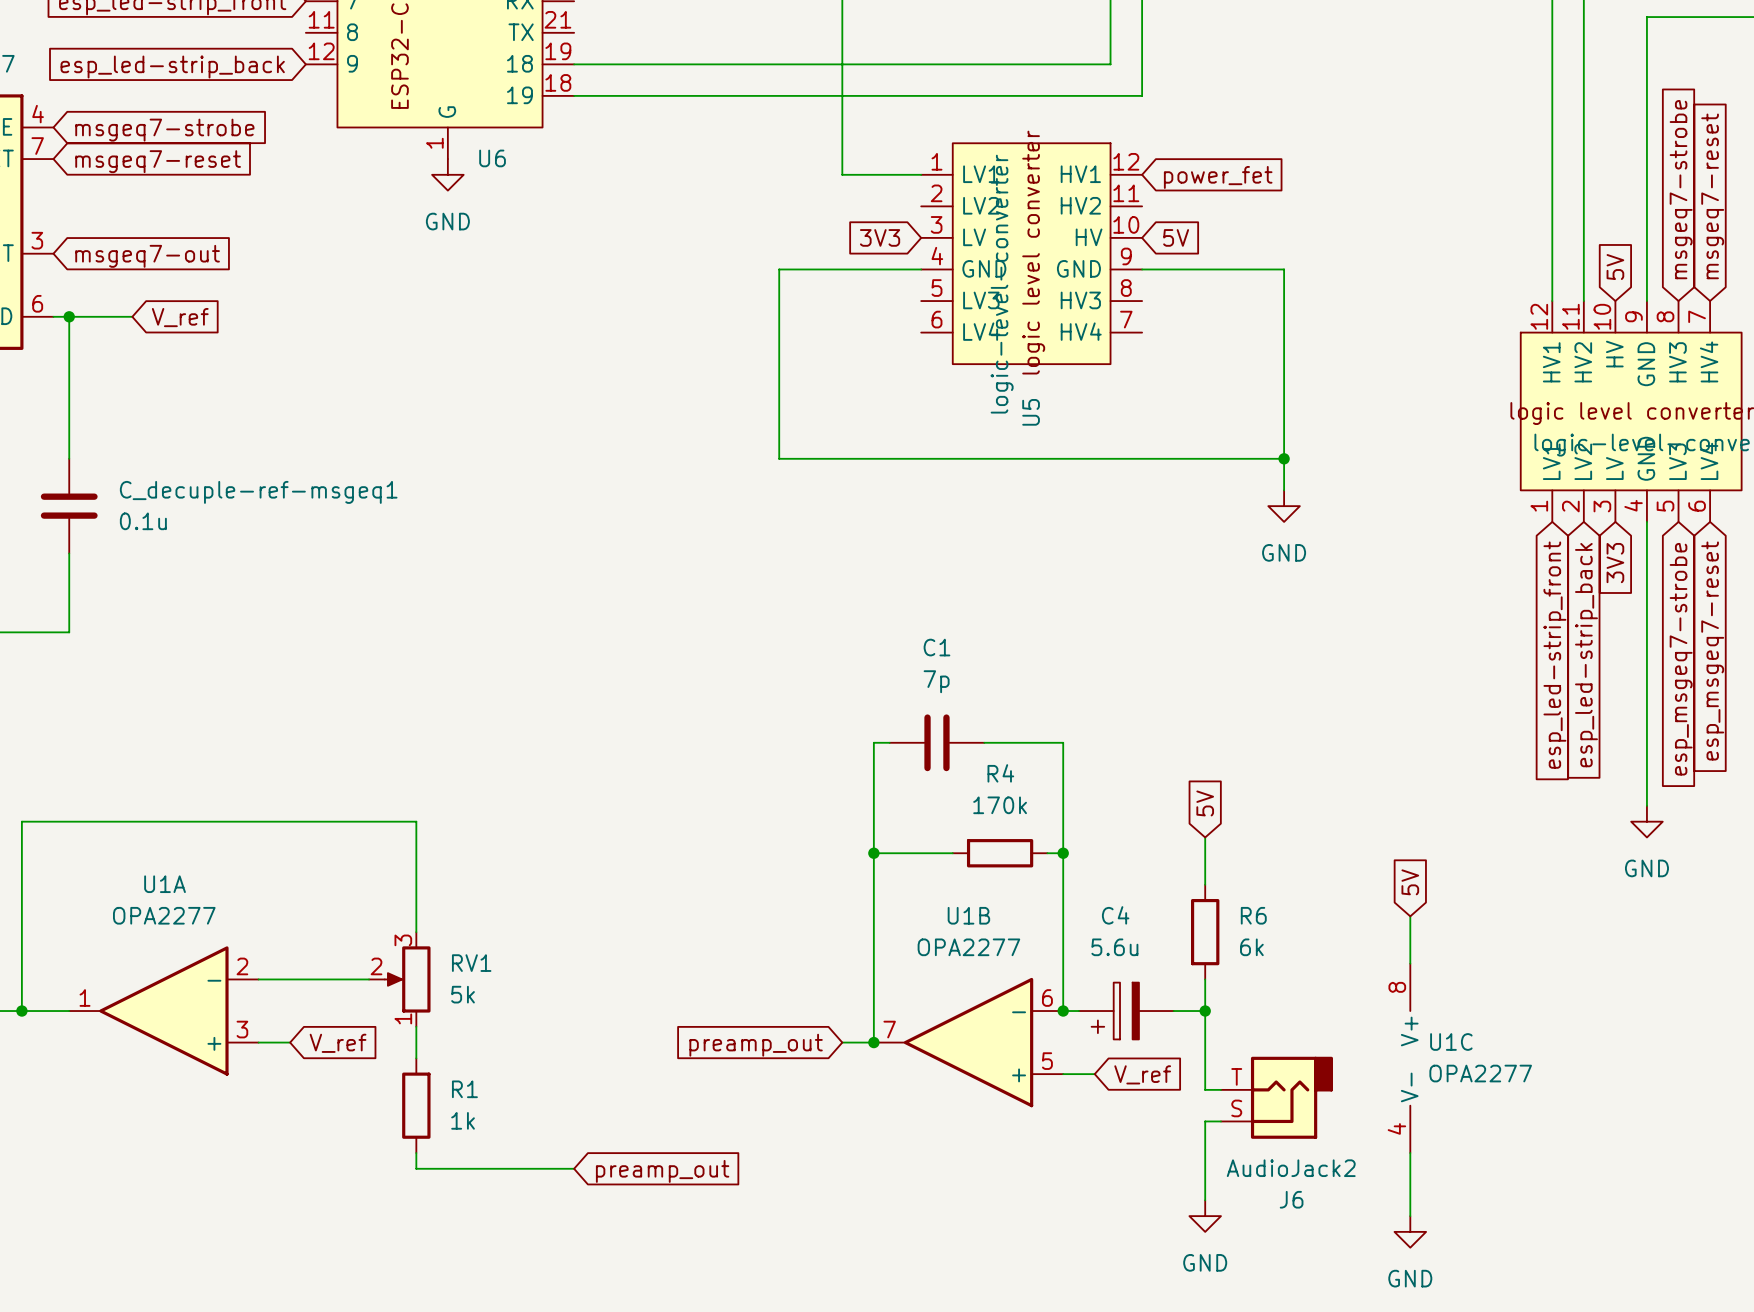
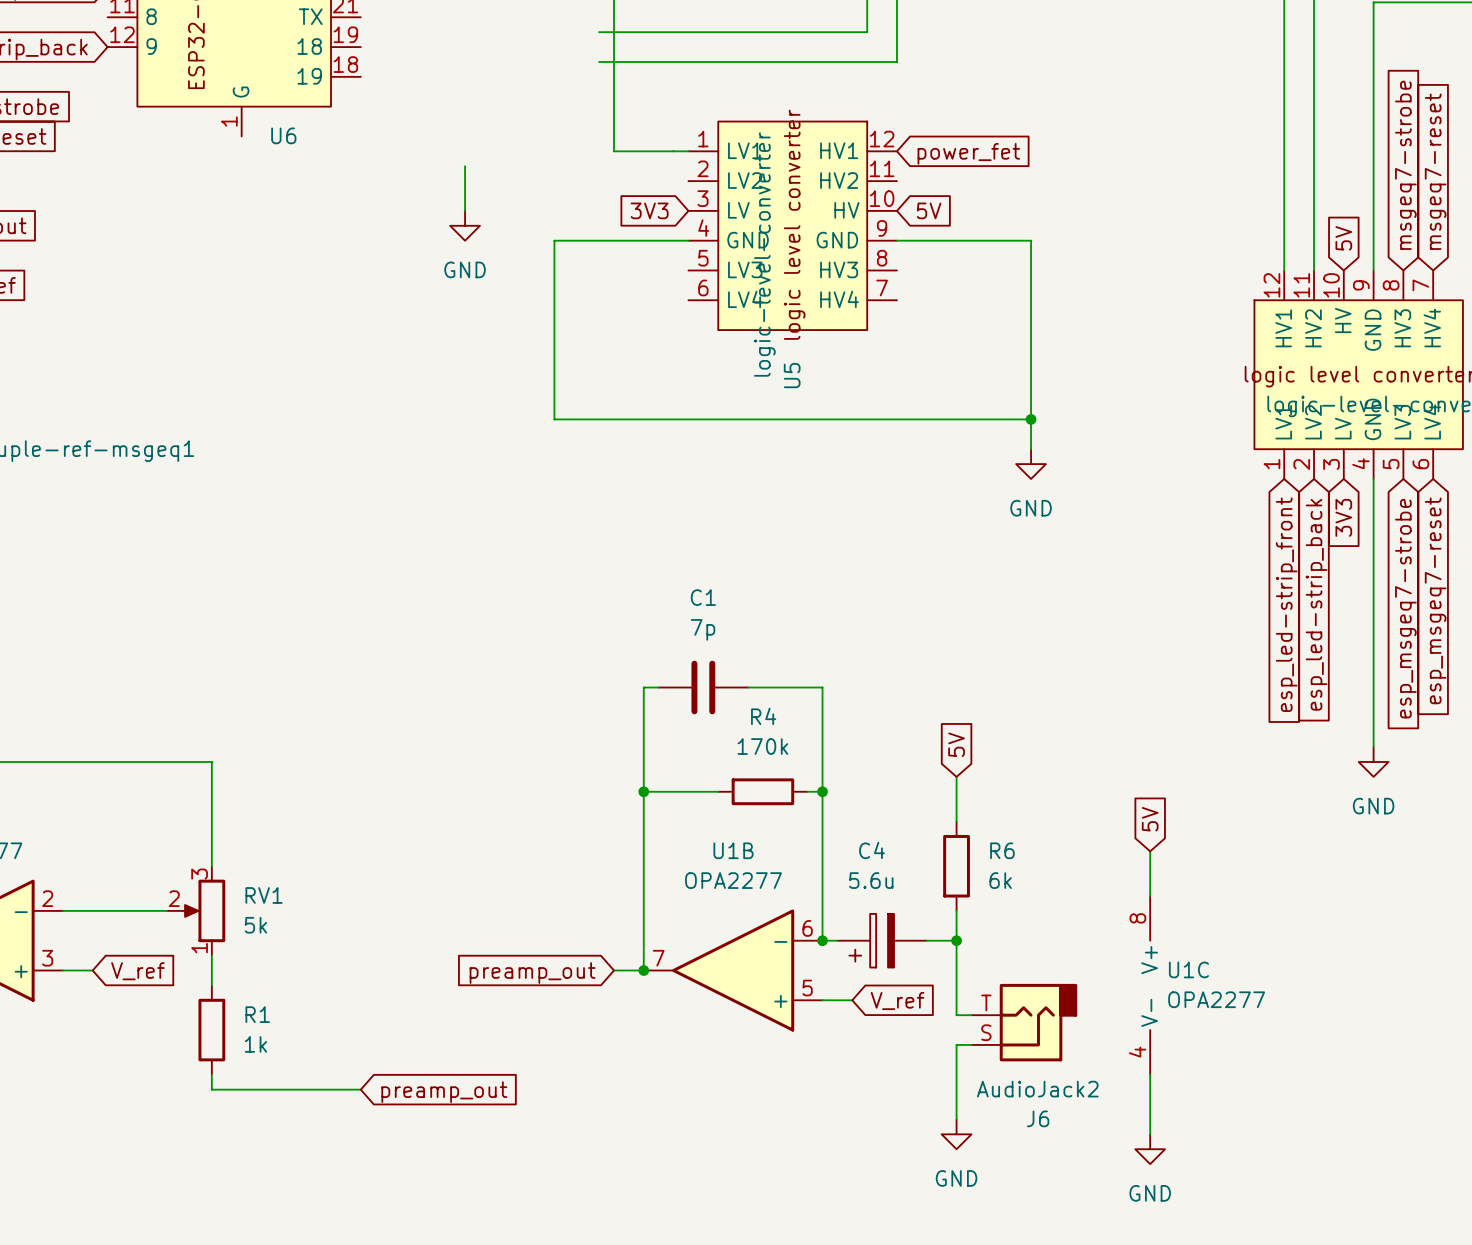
wire: (1110, 48) (1110, 64) (574, 64) -> (867, 32) (599, 32)
wire: (1142, 80) (1142, 95) (574, 95) -> (896, 61) (599, 61)
power symbol: GND (447, 174) -> none
wire: none -> (465, 166) (465, 210)
power symbol: none -> GND (465, 225)

